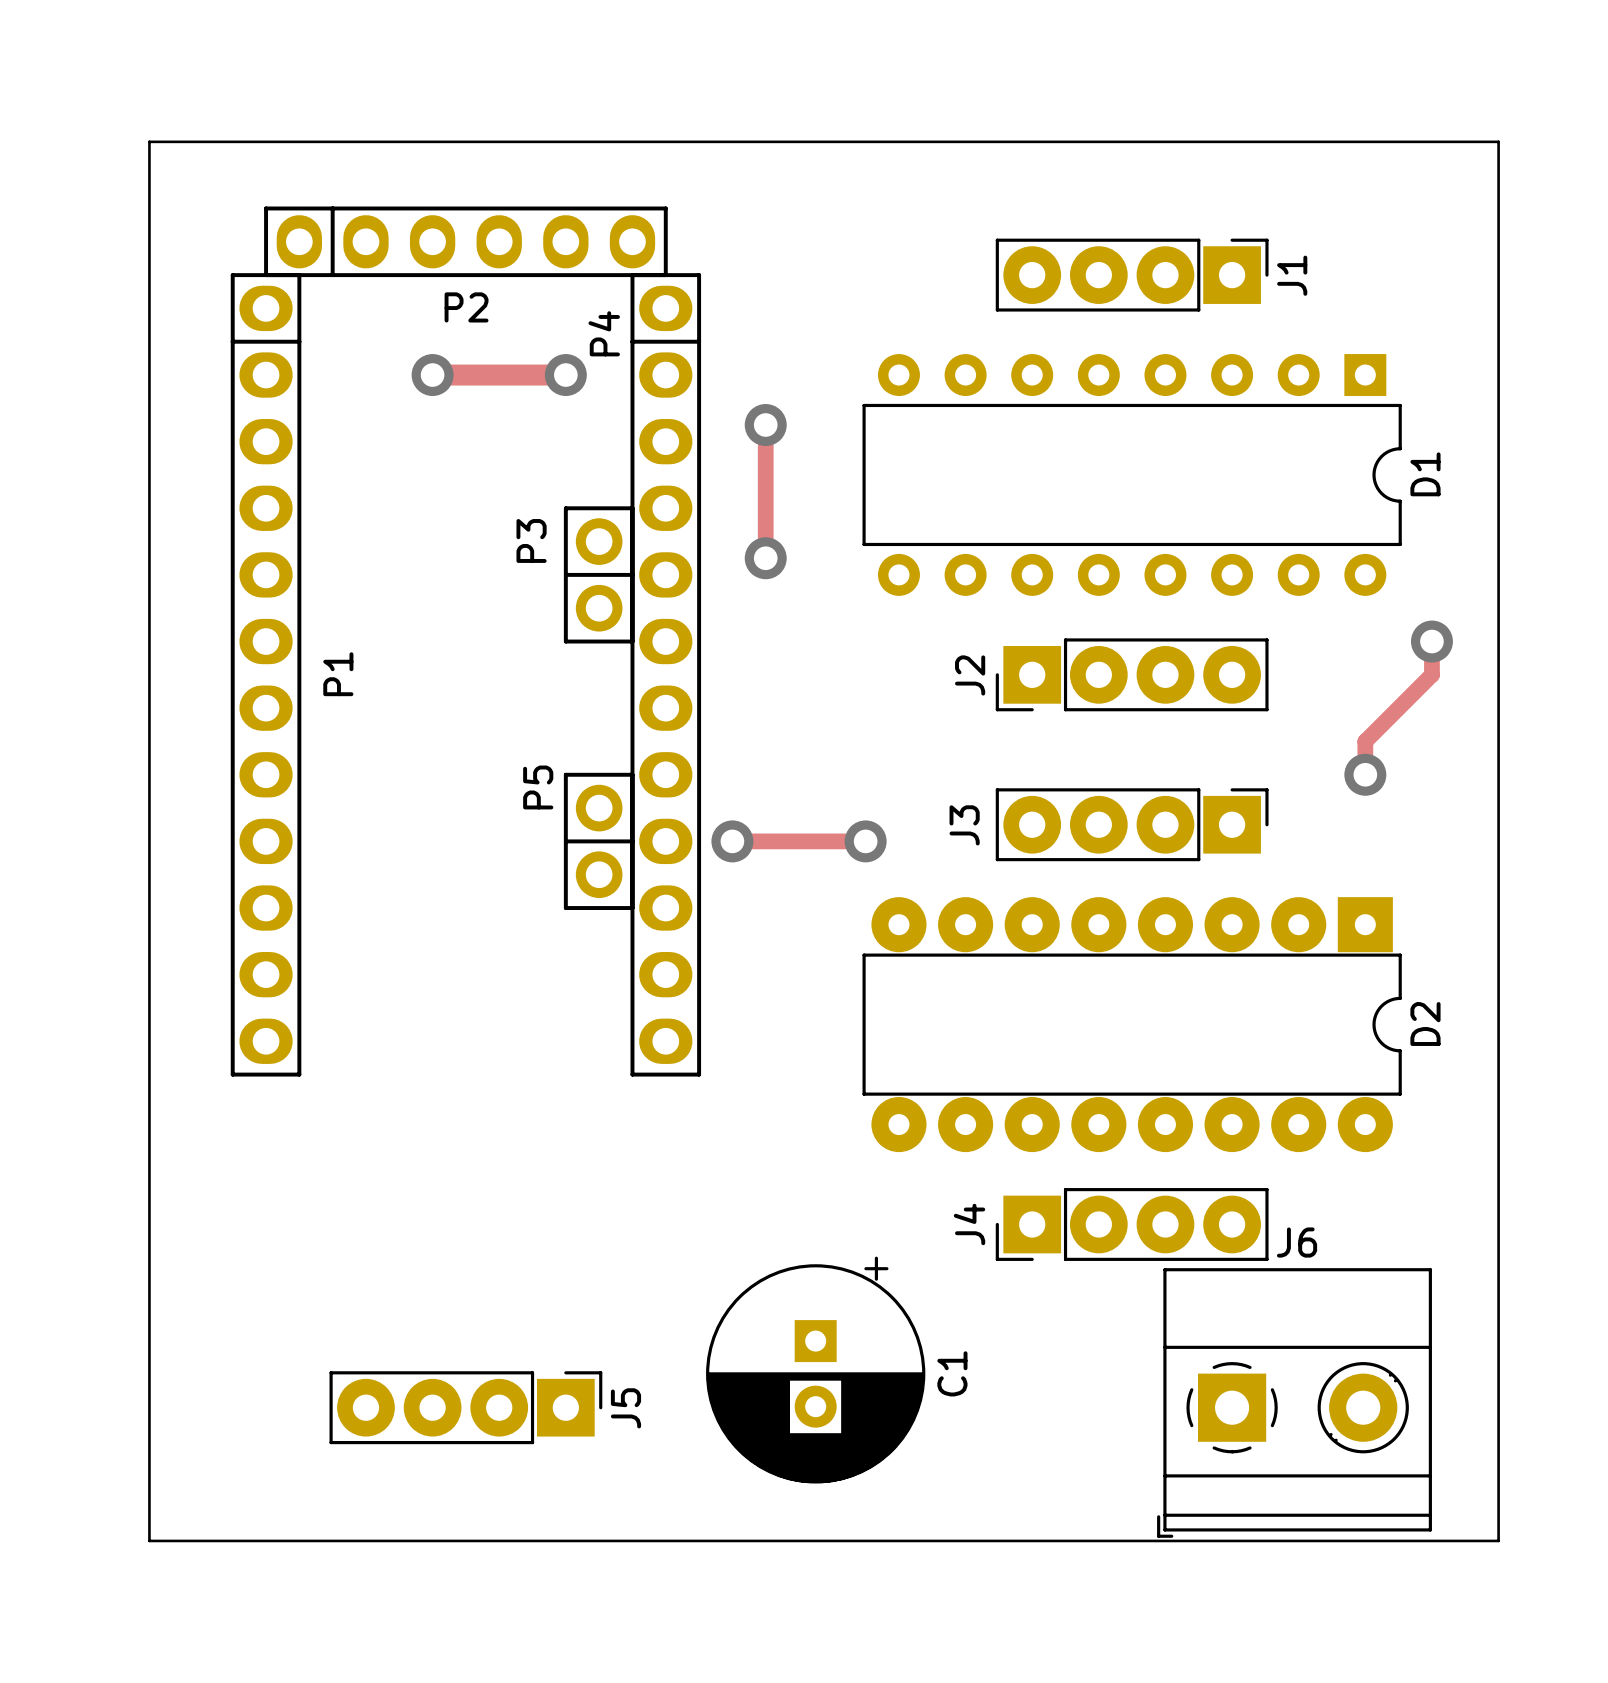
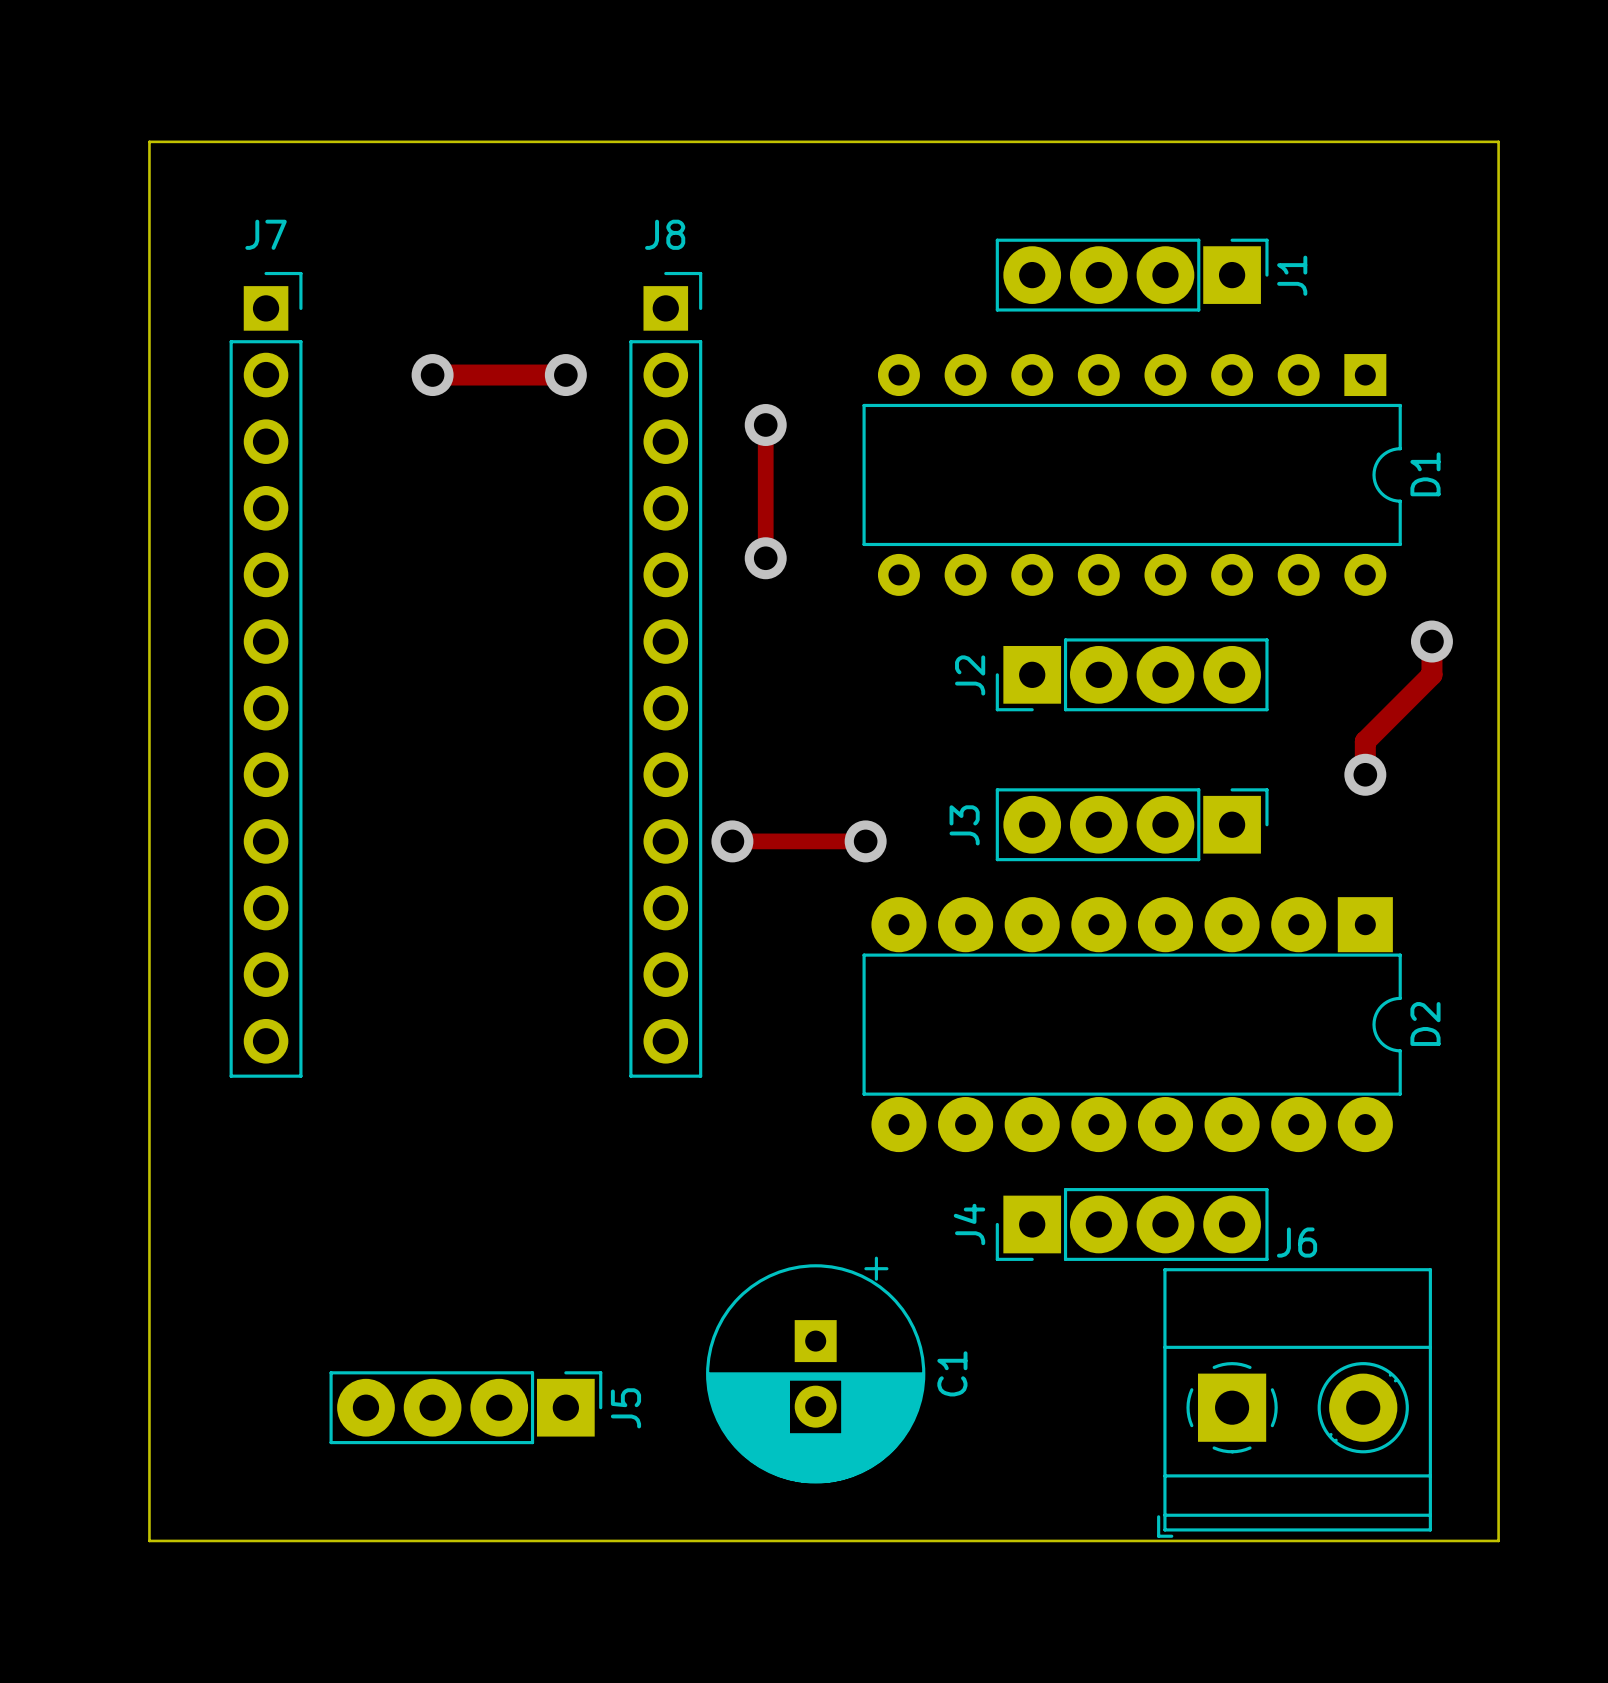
P2: (465, 241) -> none
P3: (599, 574) -> none
track width: thin (1431, 641) (1431, 674) (1365, 741) (1365, 774) -> thick (1431, 641) (1431, 674) (1365, 741) (1365, 774)
P1: (266, 674) -> none
J7: none -> (266, 674)
P4: (665, 674) -> none
J8: none -> (665, 674)
P5: (599, 841) -> none

